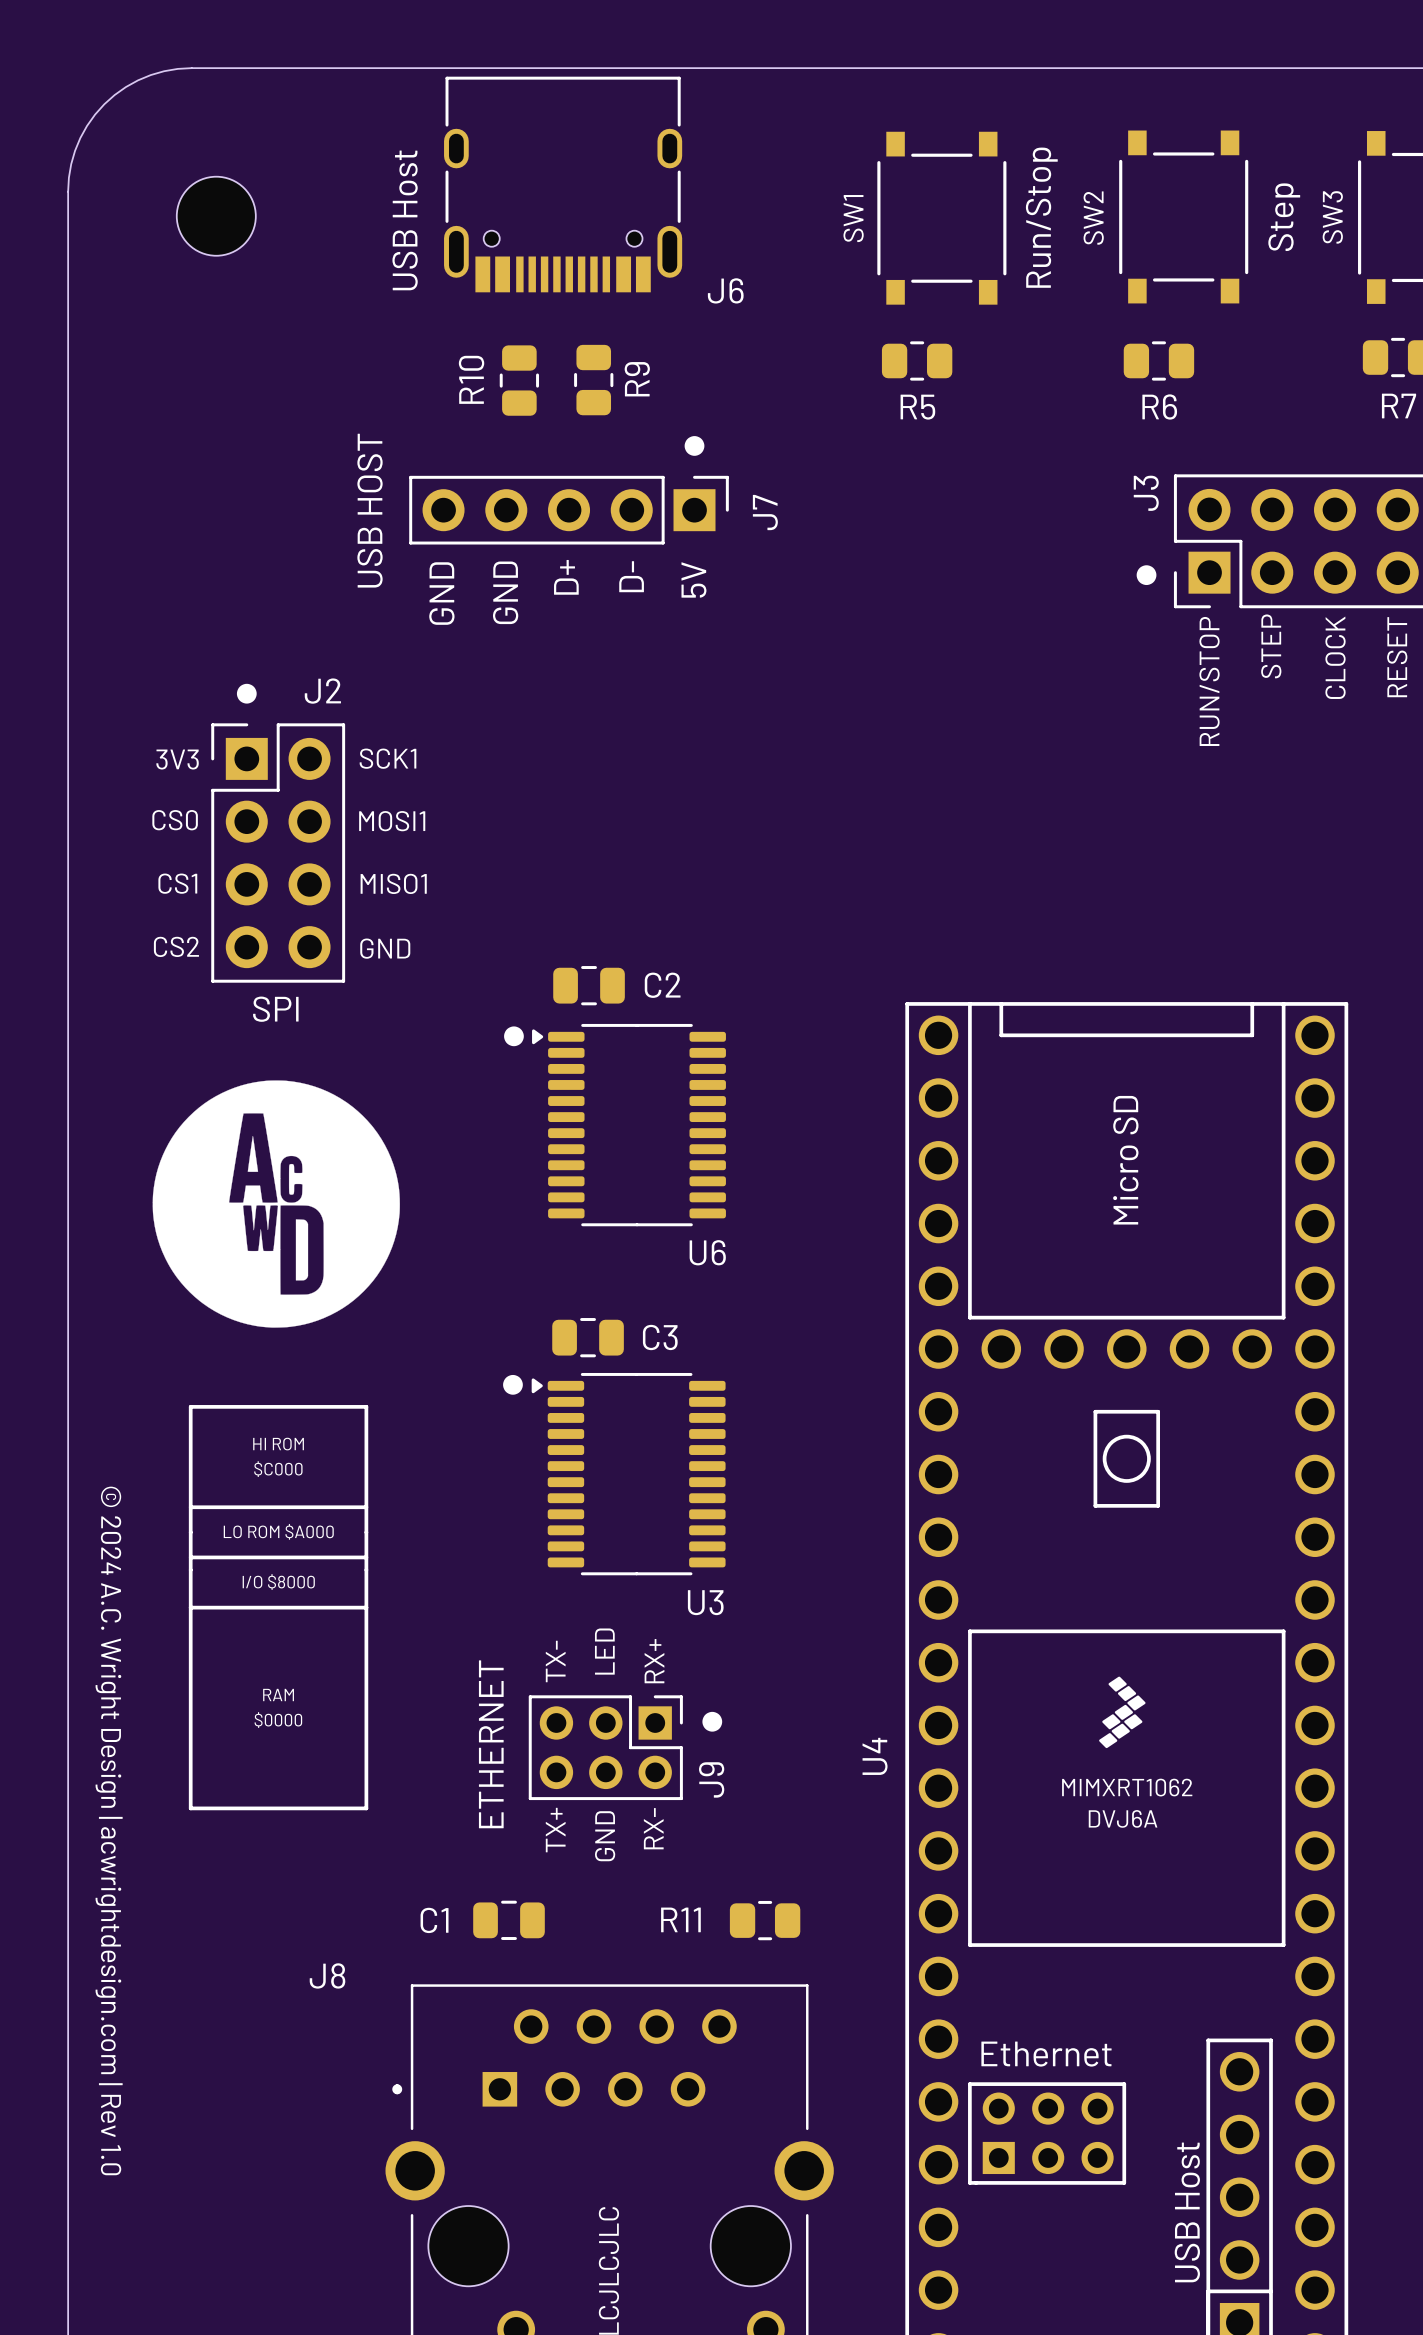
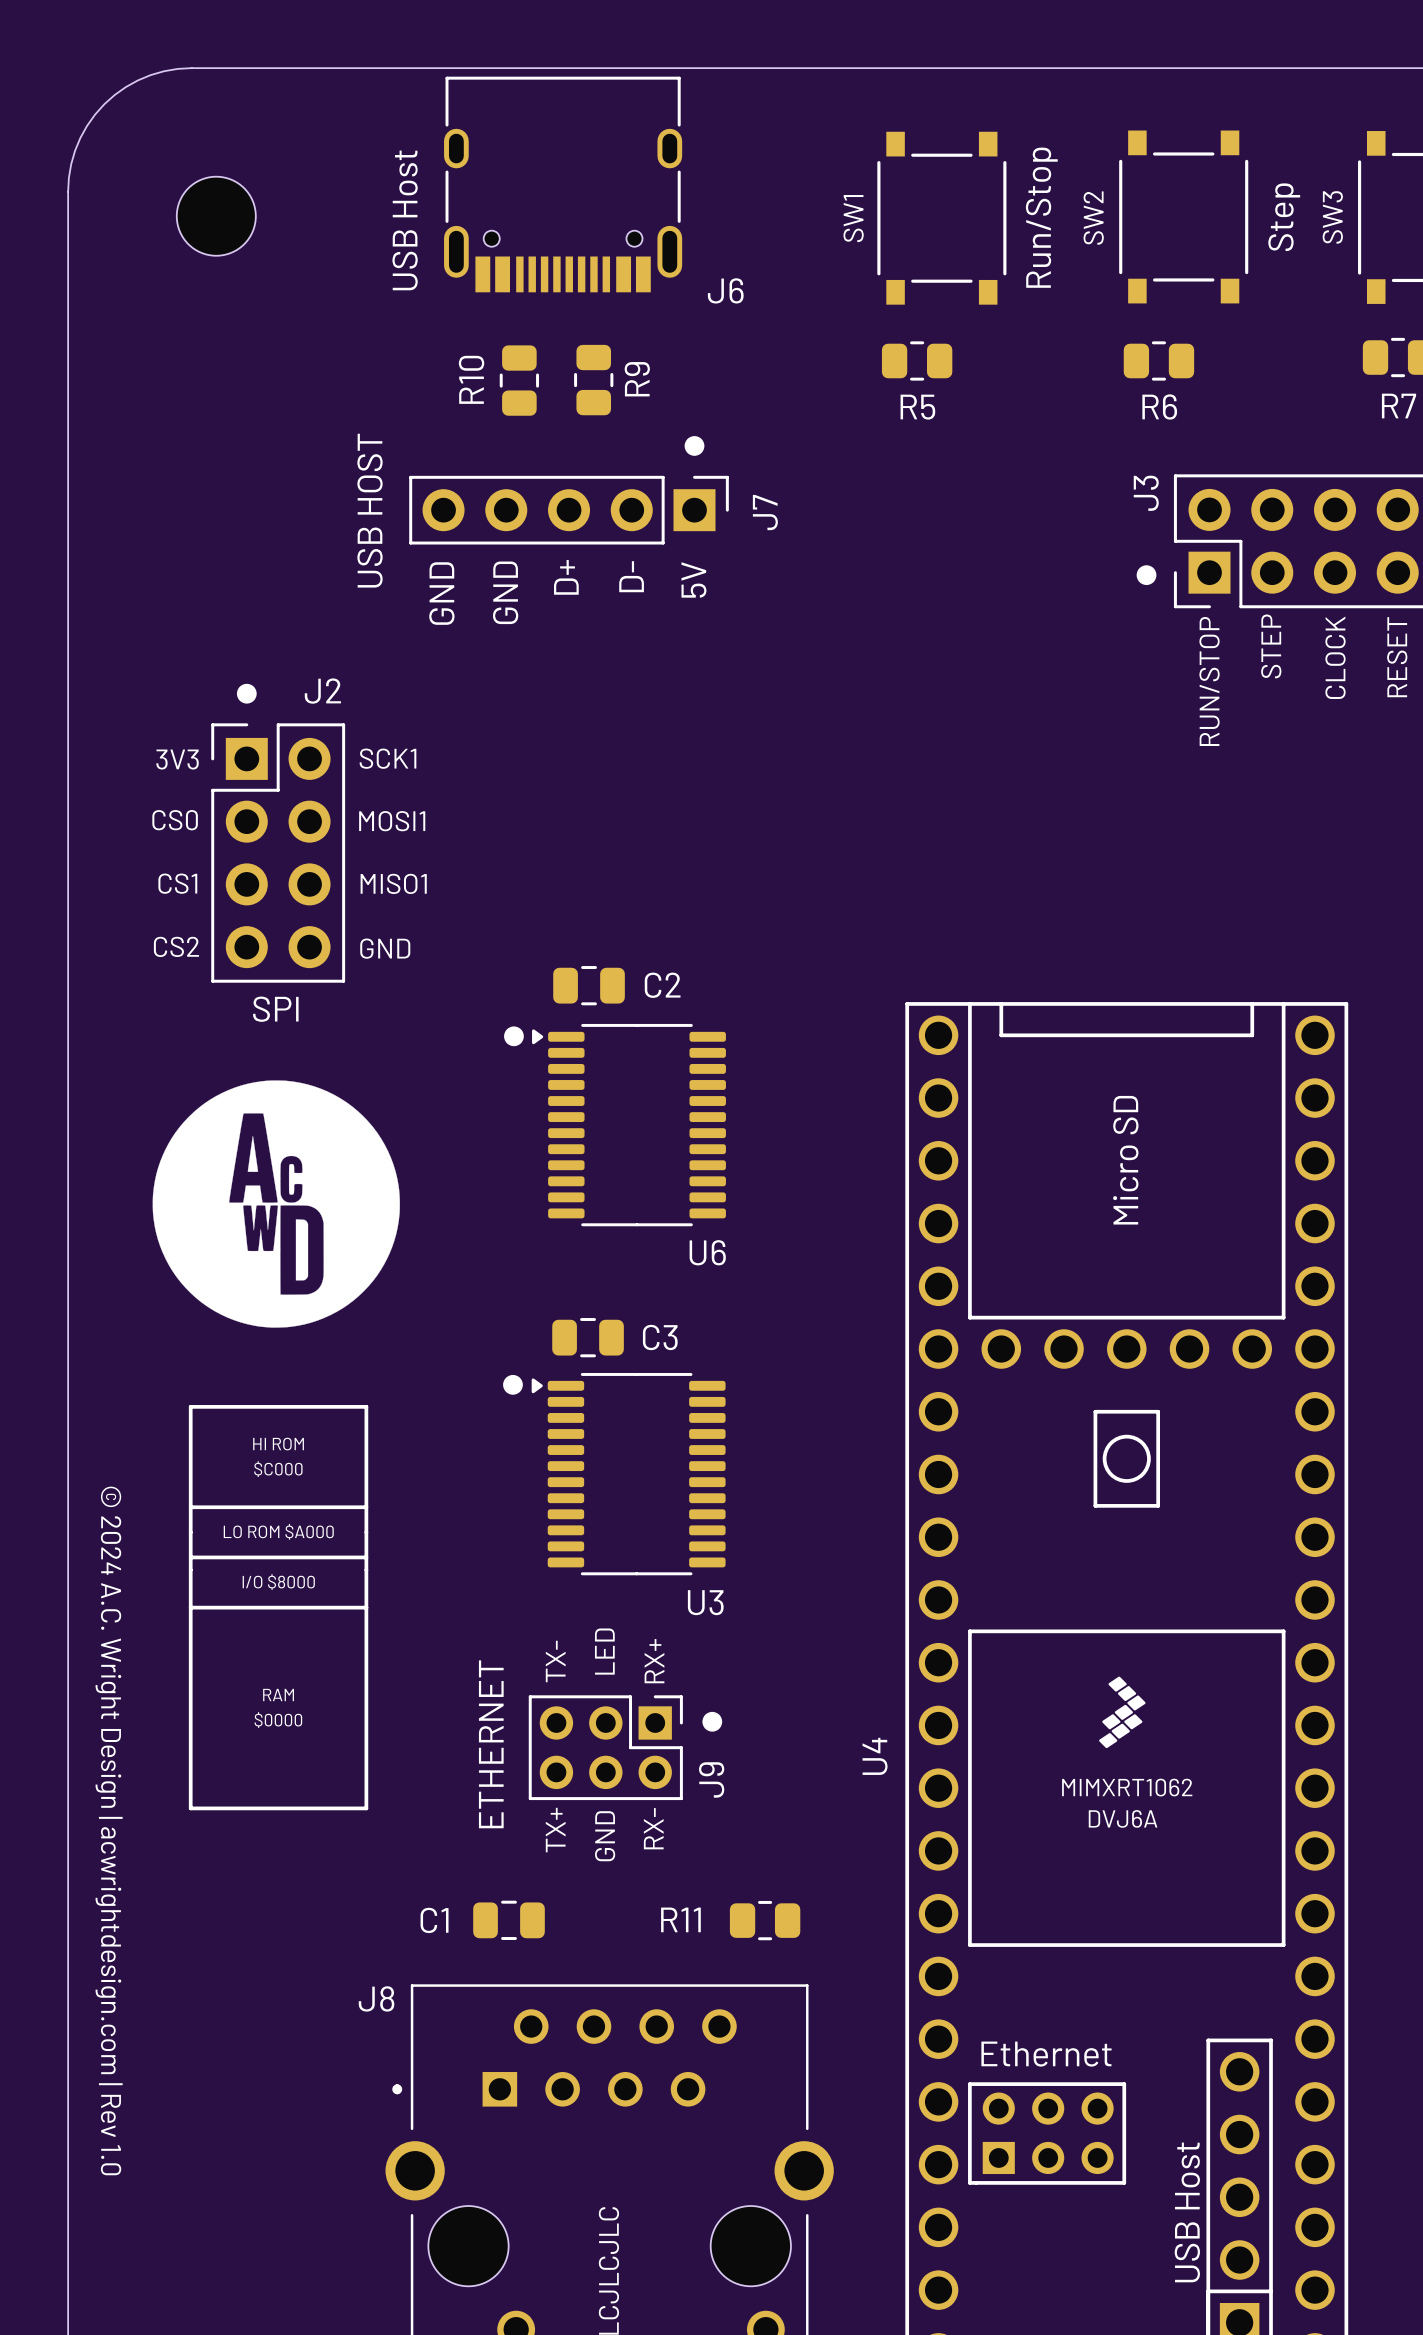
J8 name position: J8 (327, 1975) -> J8 (376, 1998)

